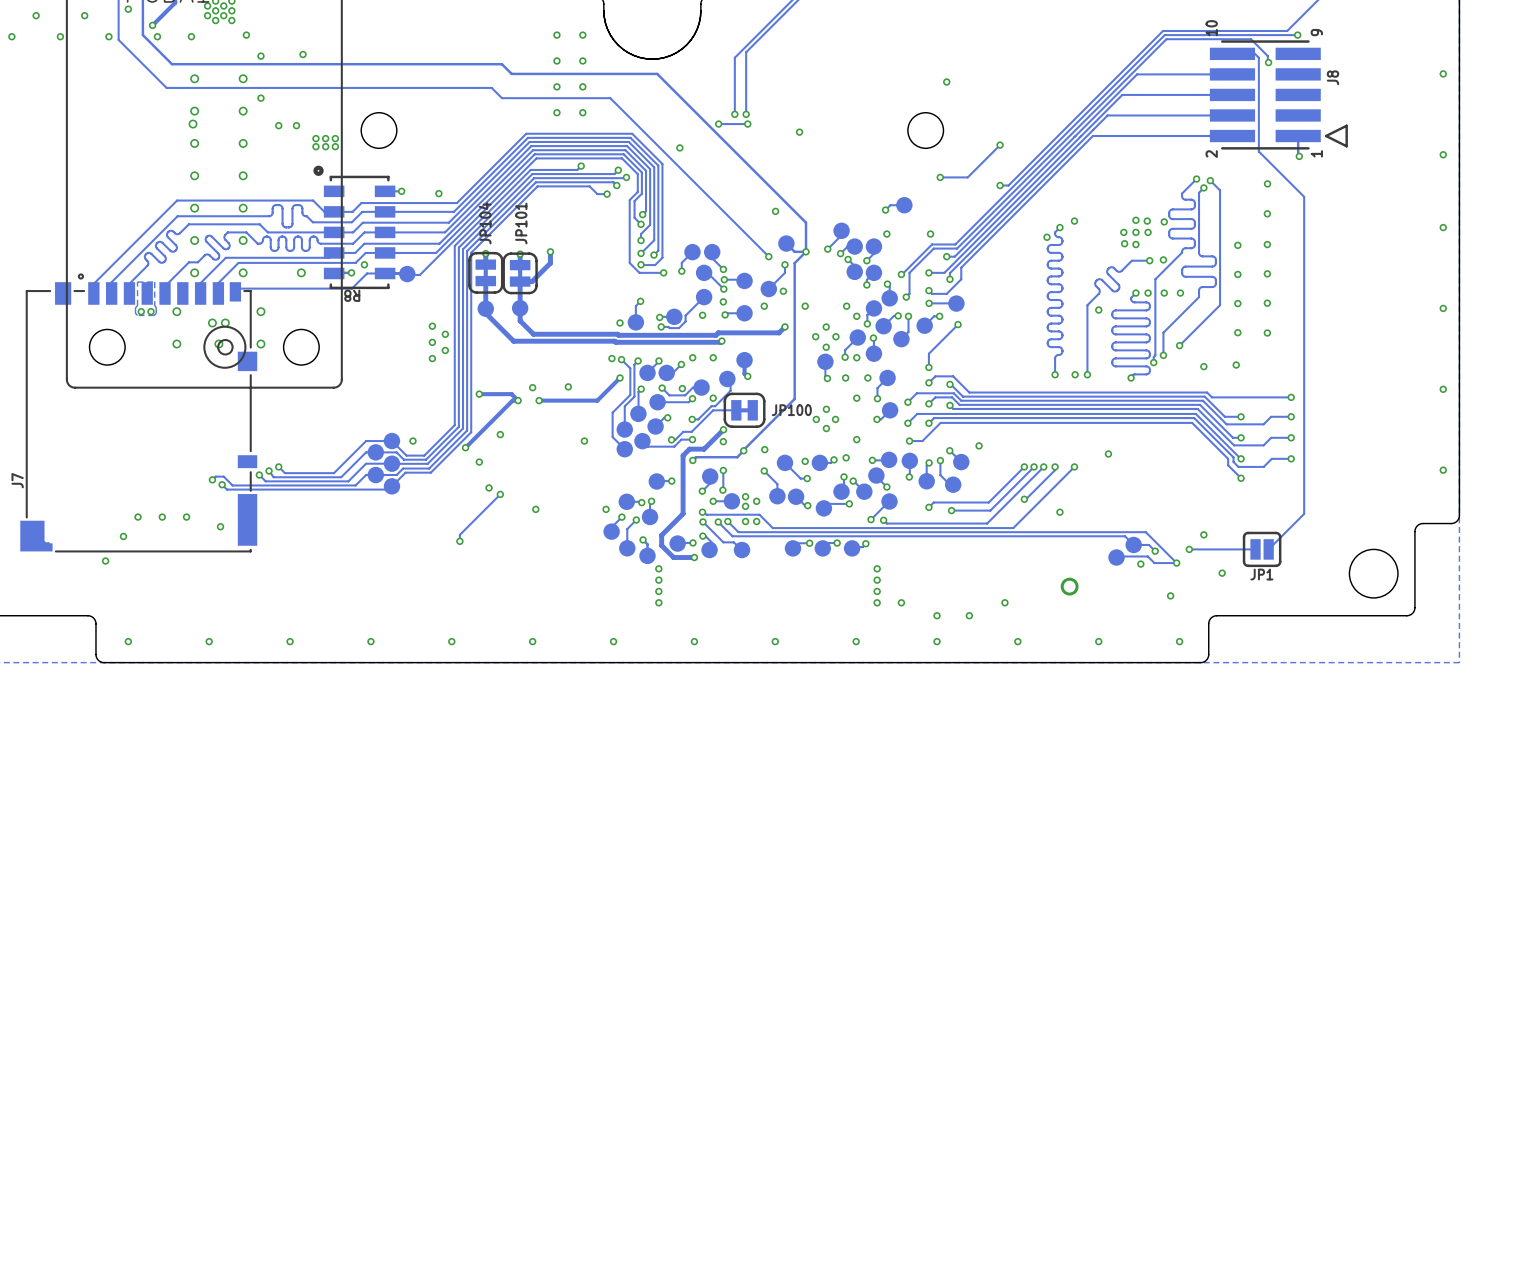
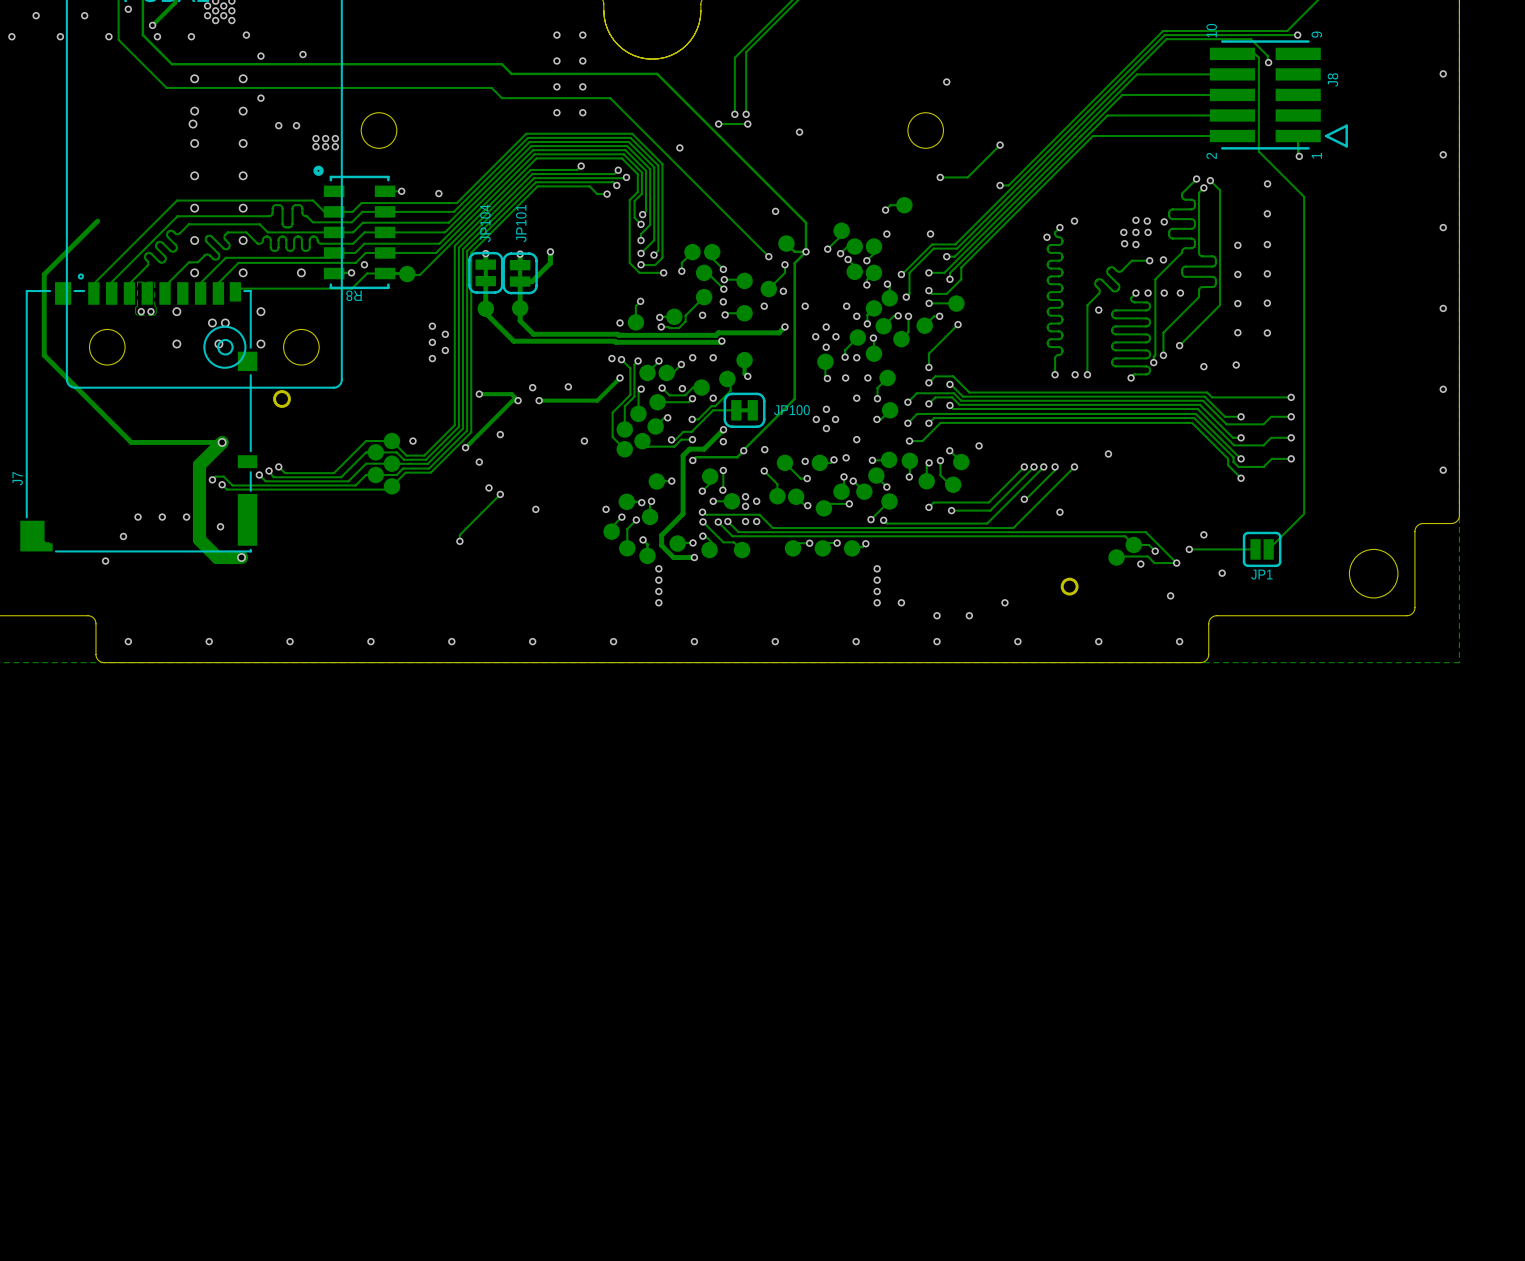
track: none -> (97, 221) (44, 274) (44, 355) (131, 442) (222, 442) (199, 465) (199, 539) (217, 557) (241, 557)
part: none -> (281, 399)
via: none -> (222, 442)
via: none -> (241, 557)

